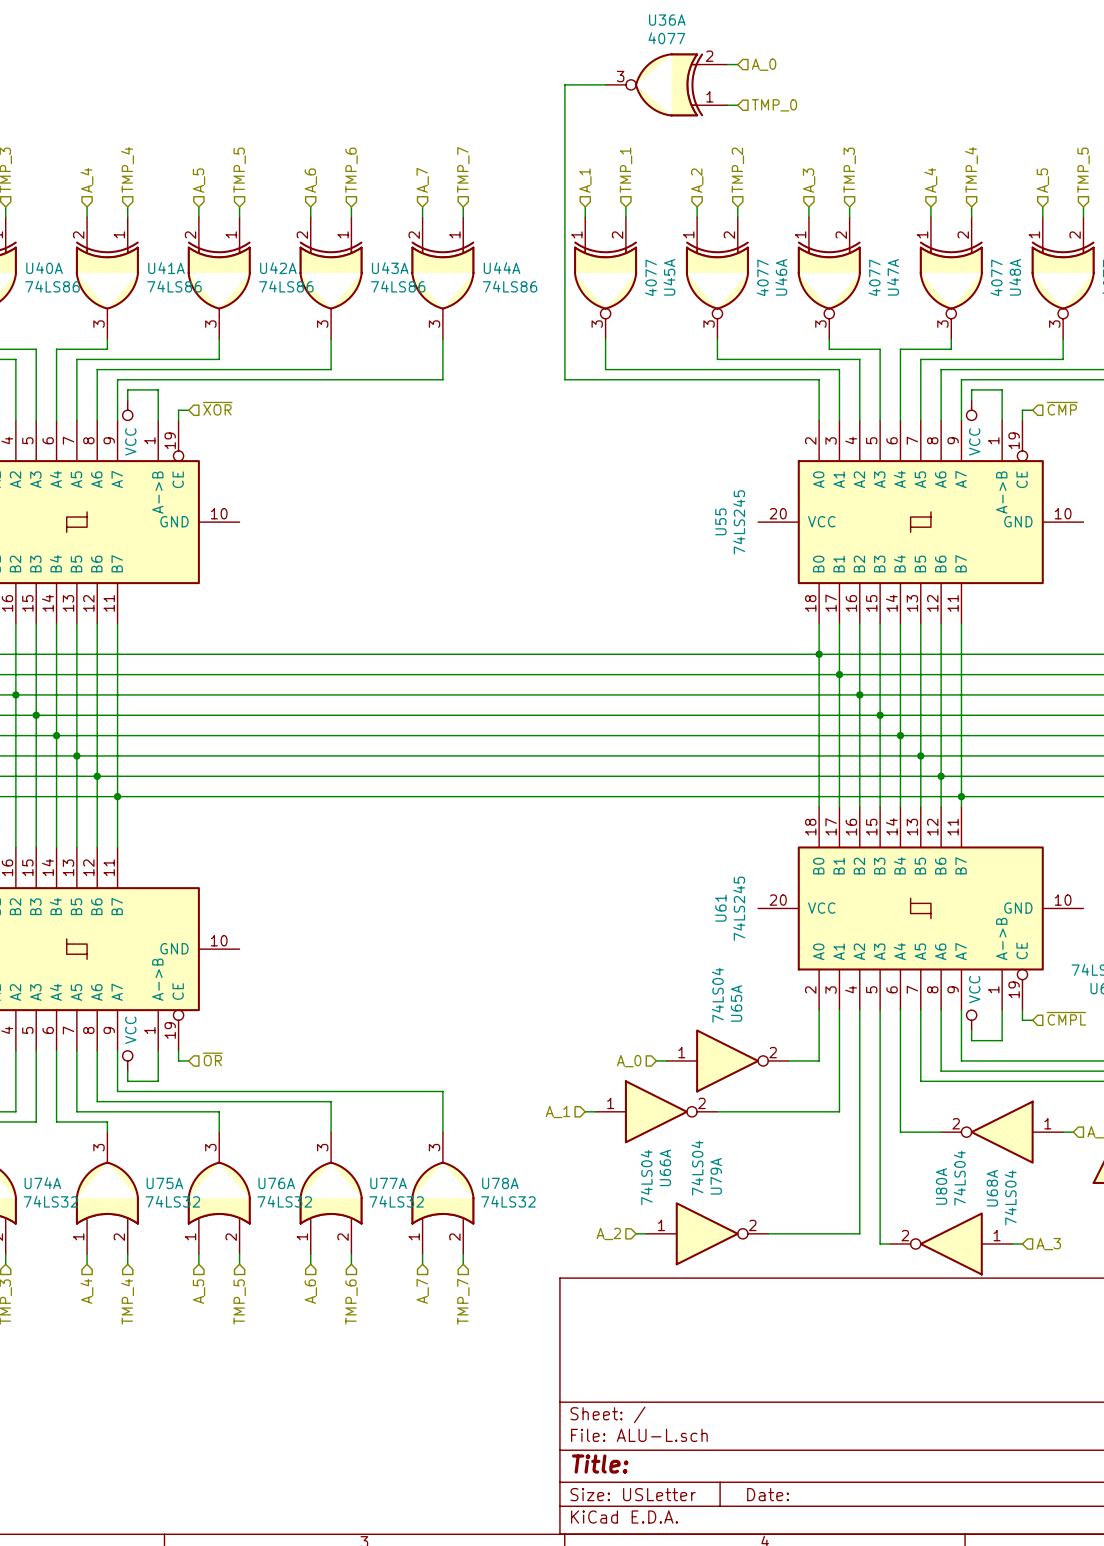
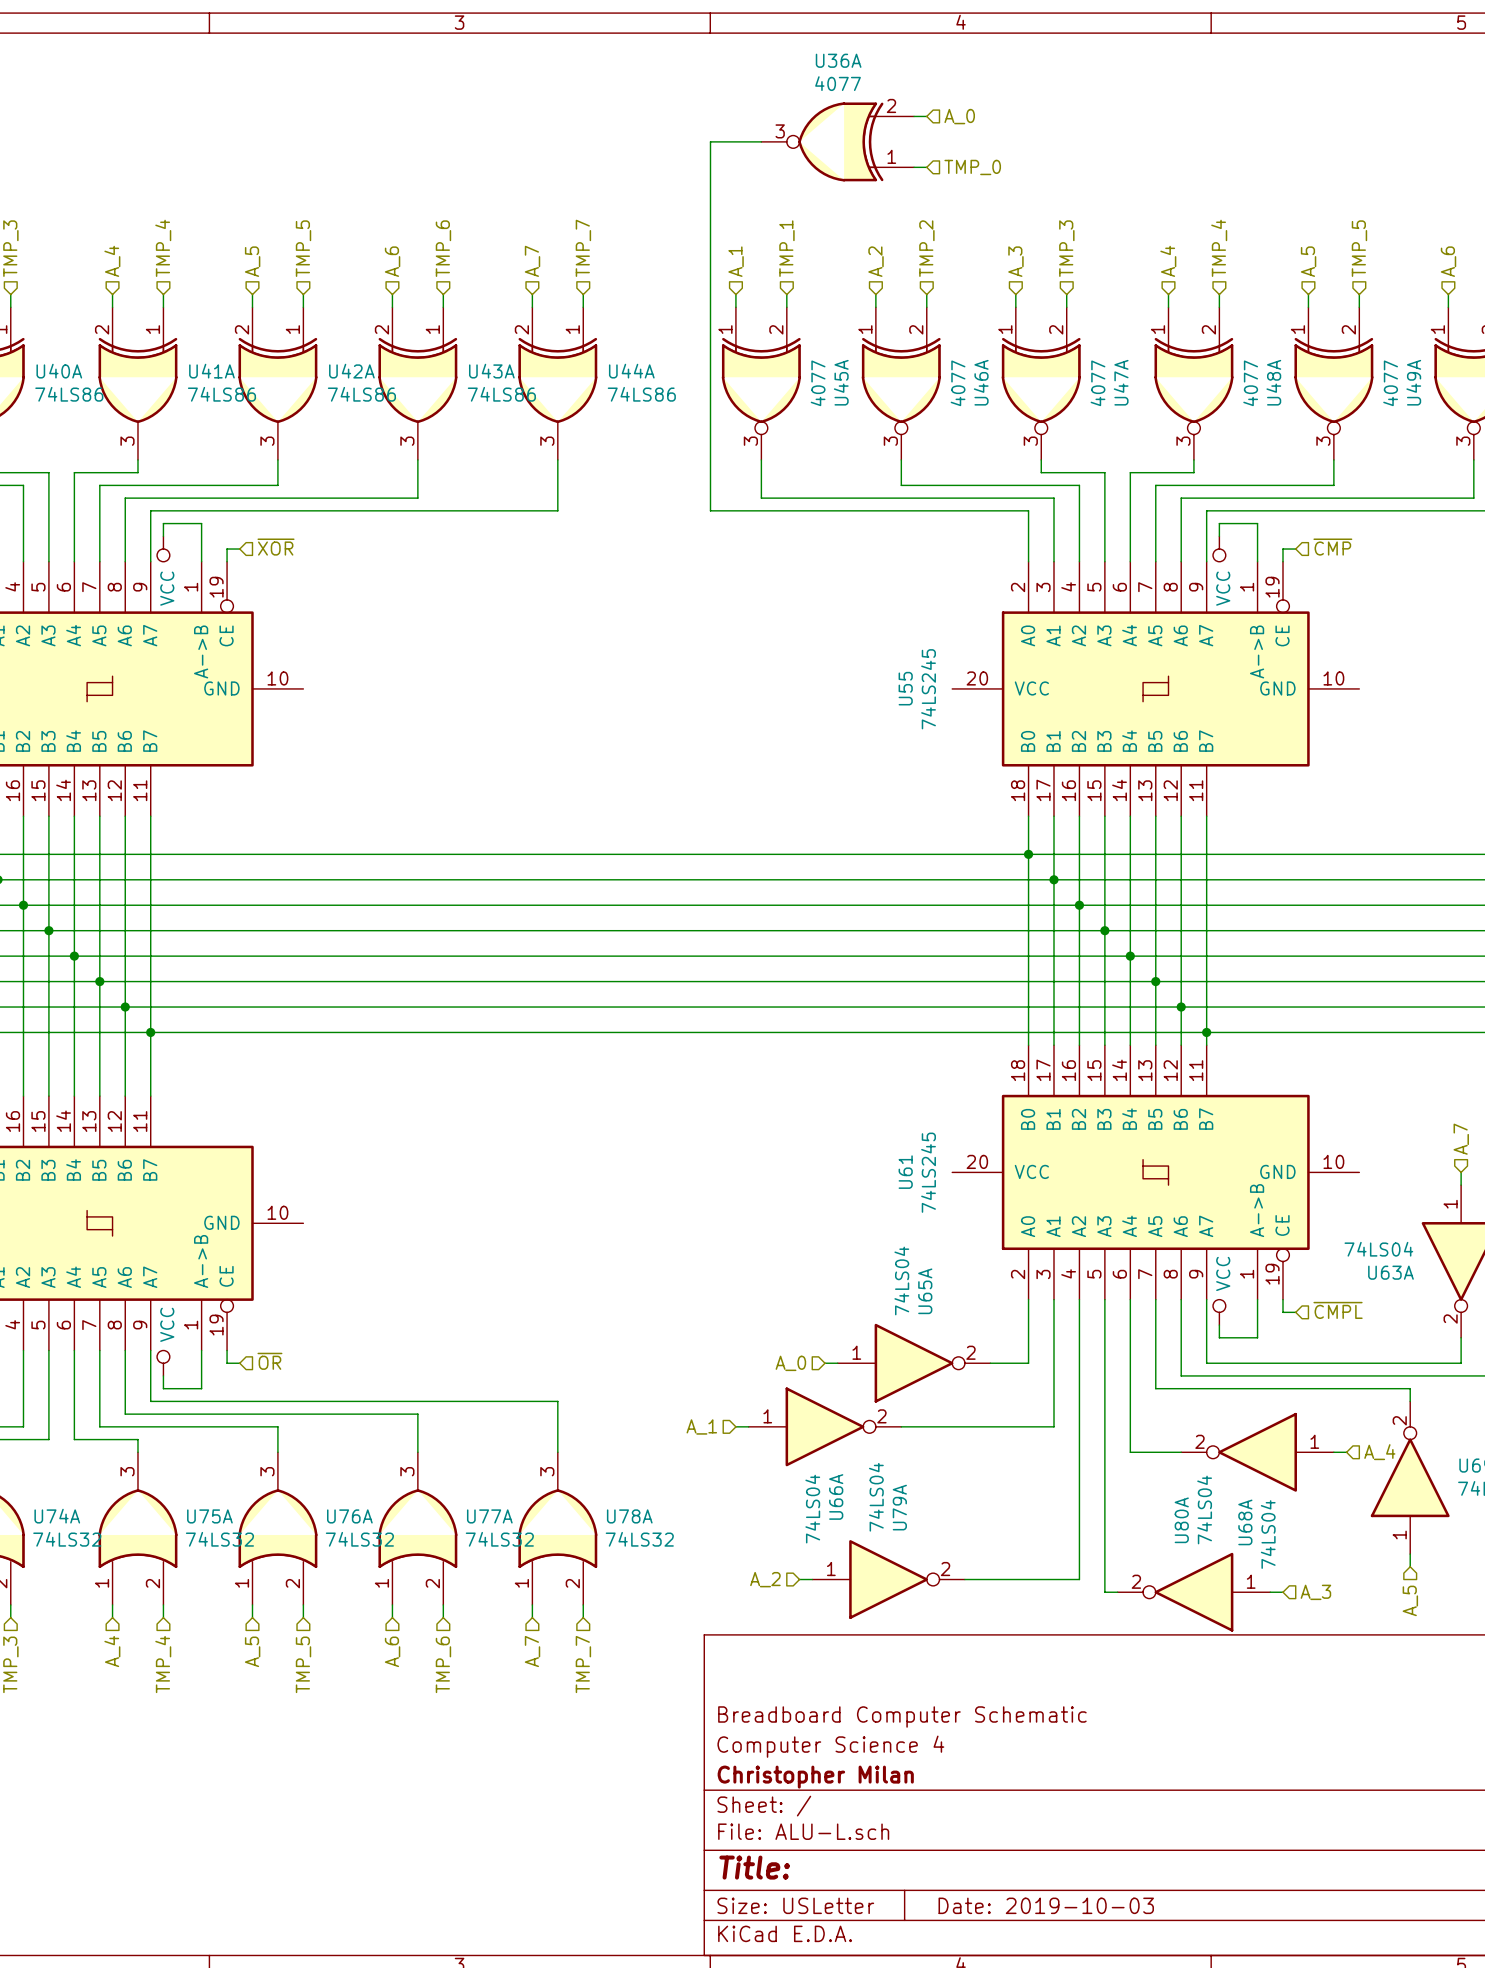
title block: none -> Breadboard Computer Schematic (902, 1717)
title block: none -> Computer Science 4 (830, 1746)
title block: none -> Christopher Milan (815, 1777)
title block: Date: (768, 1494) -> Date: 2019-10-03 (1046, 1905)

